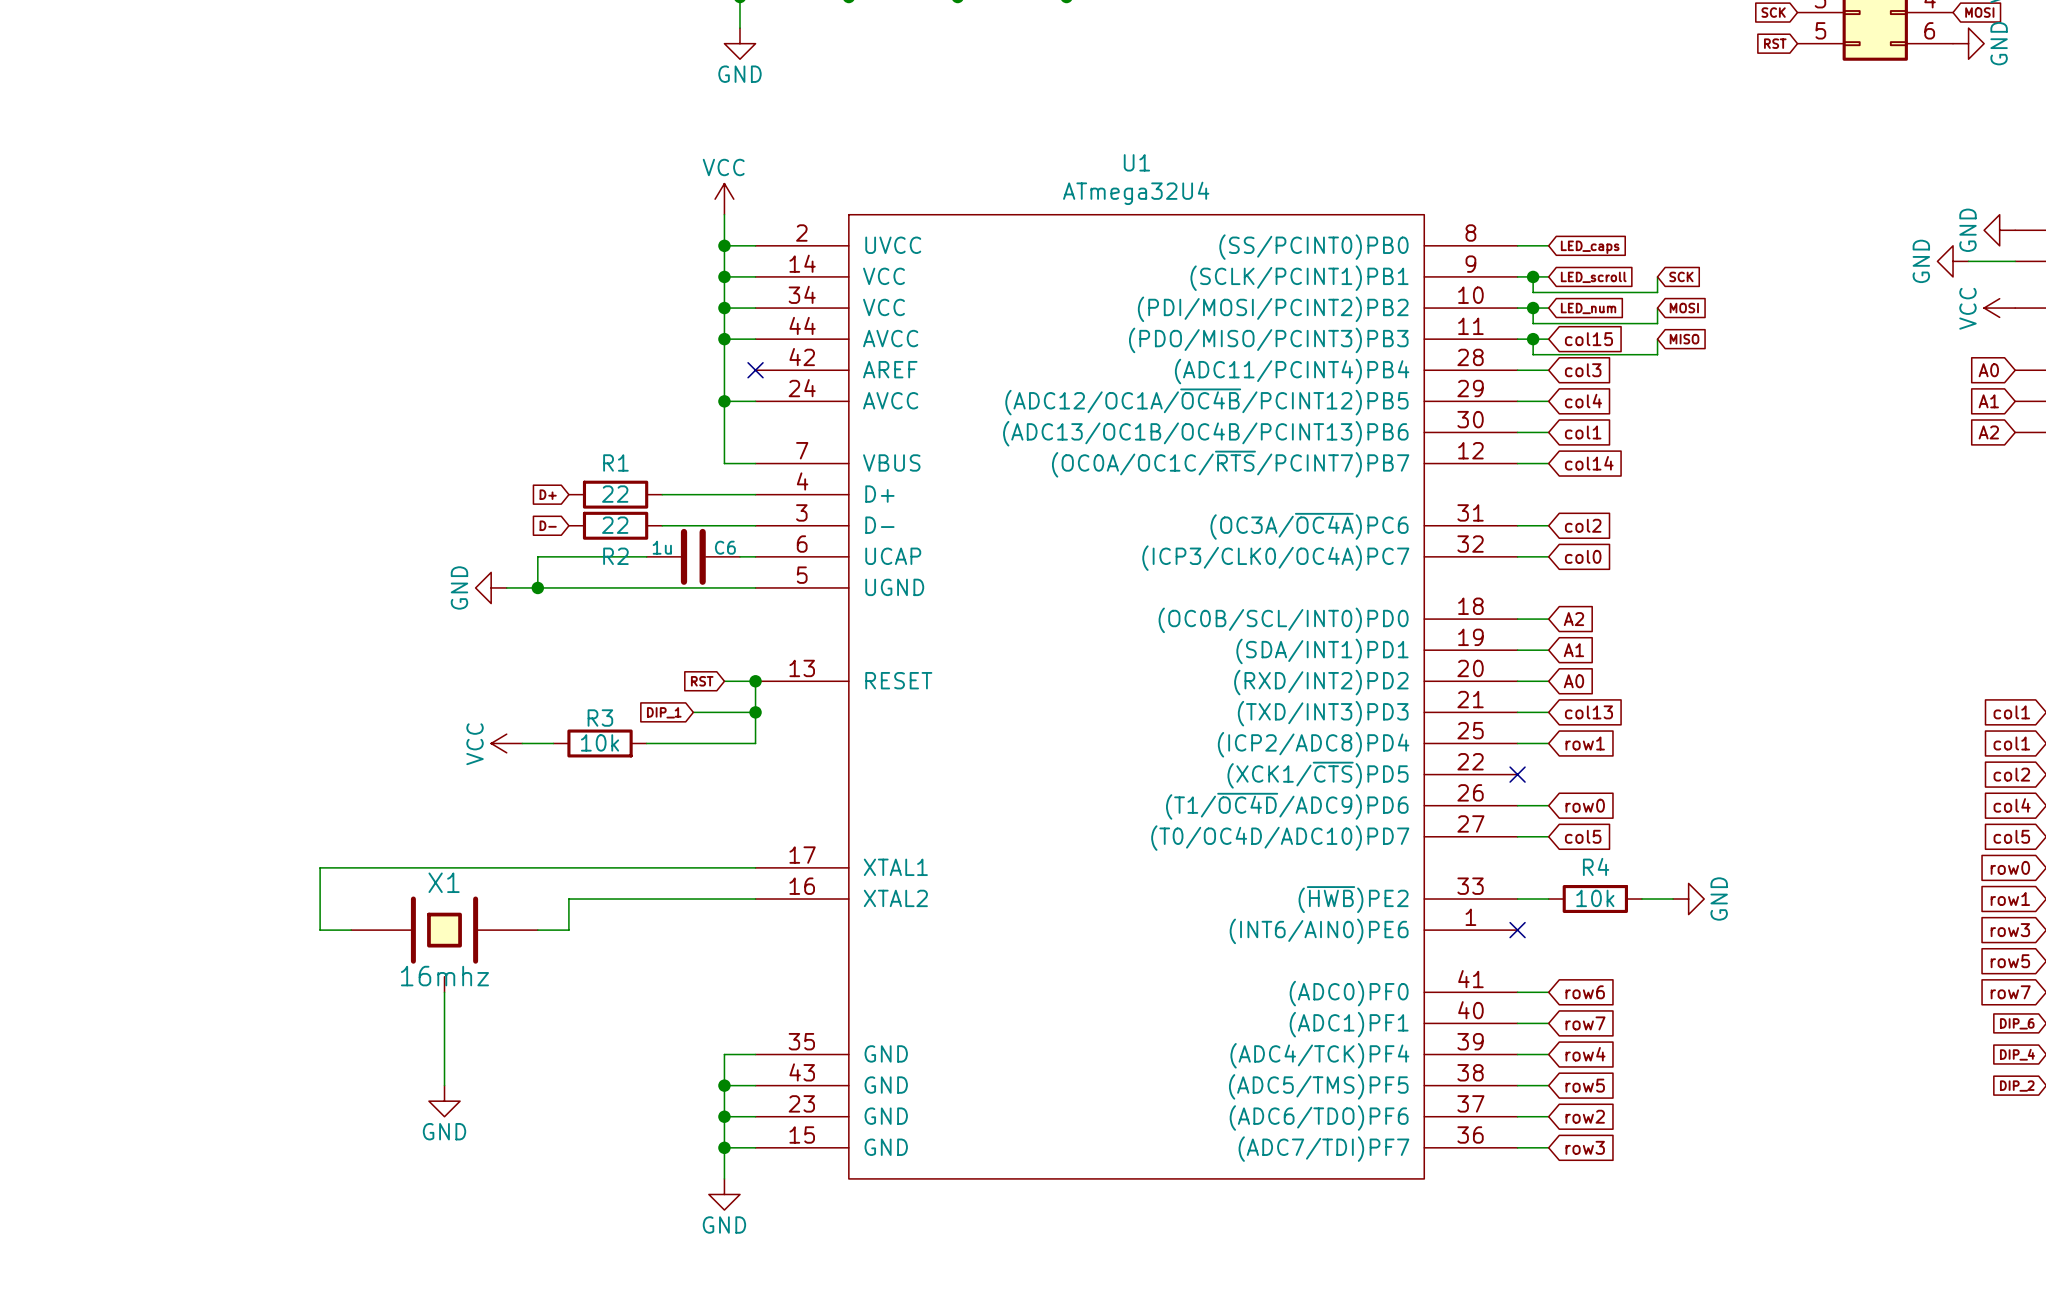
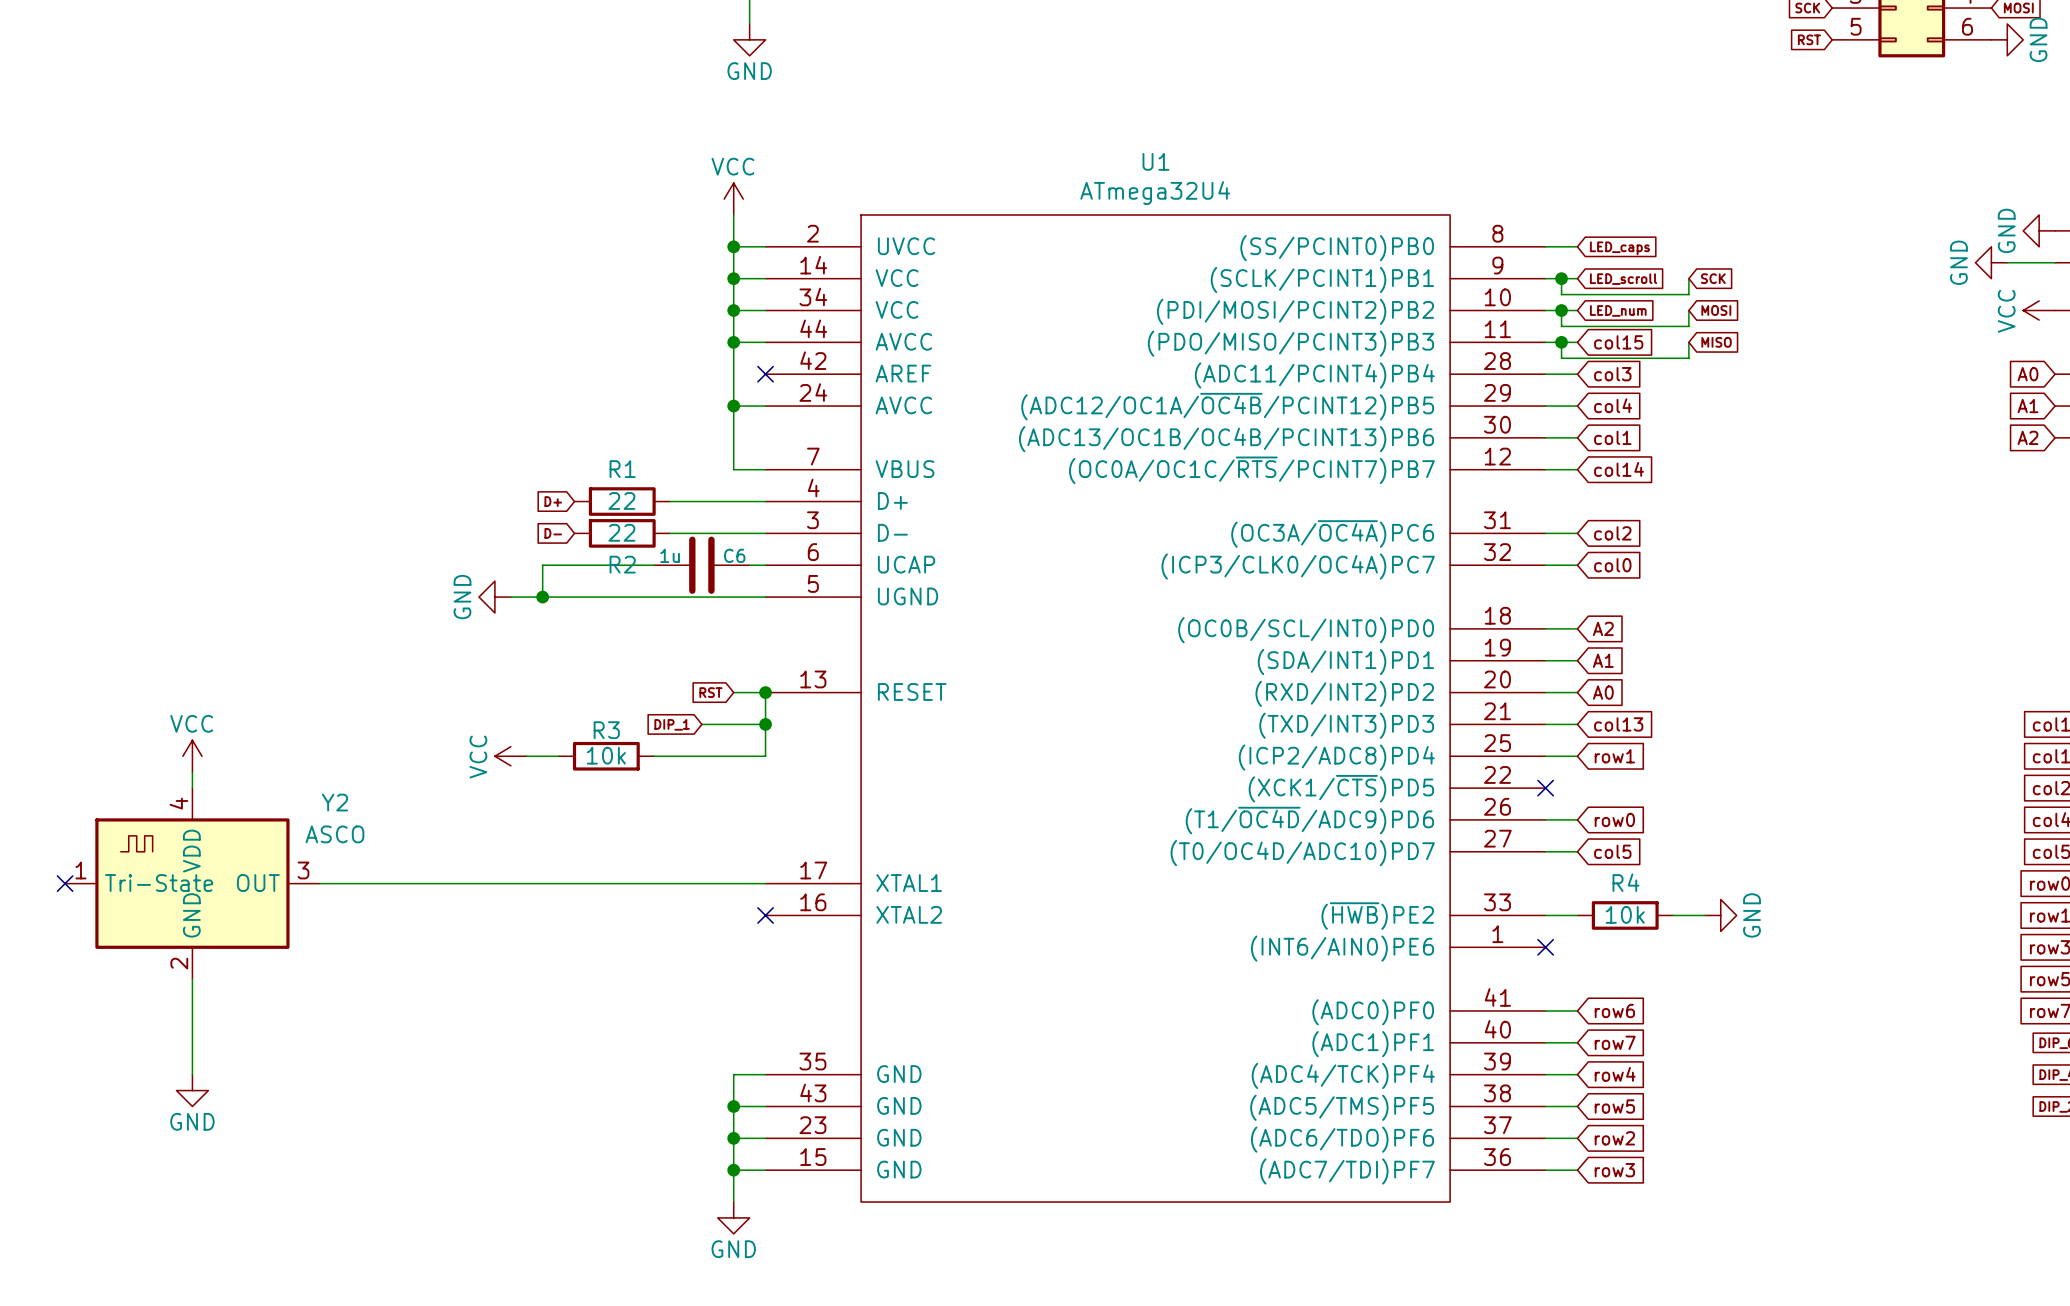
power symbol: none -> VCC (192, 756)
wire: none -> (192, 772) (192, 788)
no-connect mark: none -> (65, 883)
Y2: none -> ASCO (192, 883)
wire: (320, 867) (320, 930) (351, 930) -> none
wire: (755, 899) (568, 899) (568, 930) (537, 930) -> none
no-connect mark: none -> (765, 915)
X1: 16mhz (444, 944) -> none
wire: (444, 992) (444, 1085) -> (192, 979) (192, 1074)
power symbol position: GND (444, 1101) -> GND (192, 1090)

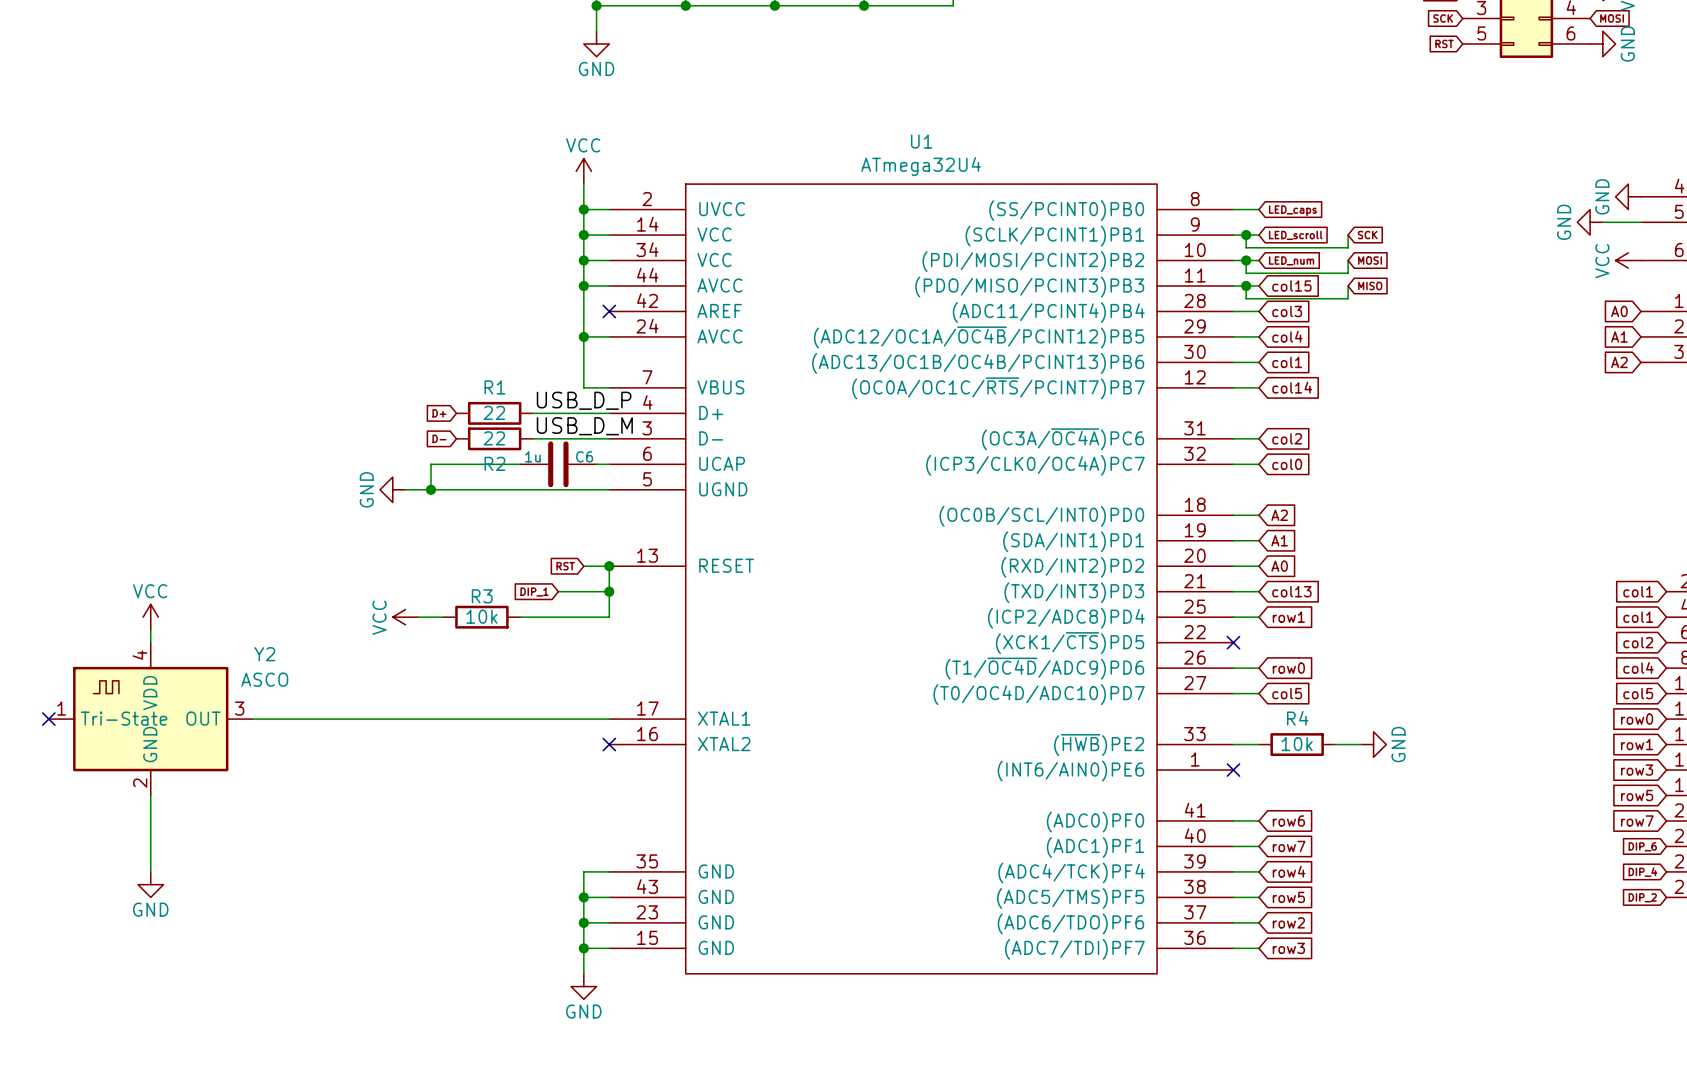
label: none -> USB_D_P (584, 400)
label: none -> USB_D_M (584, 426)

